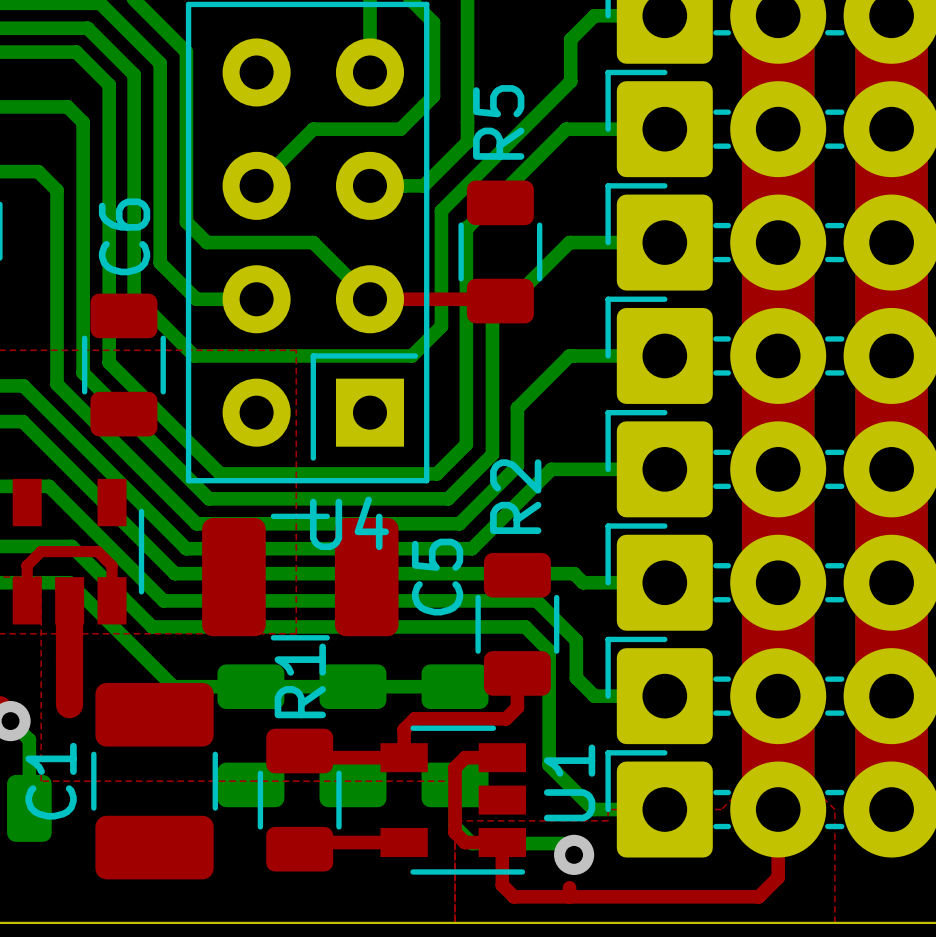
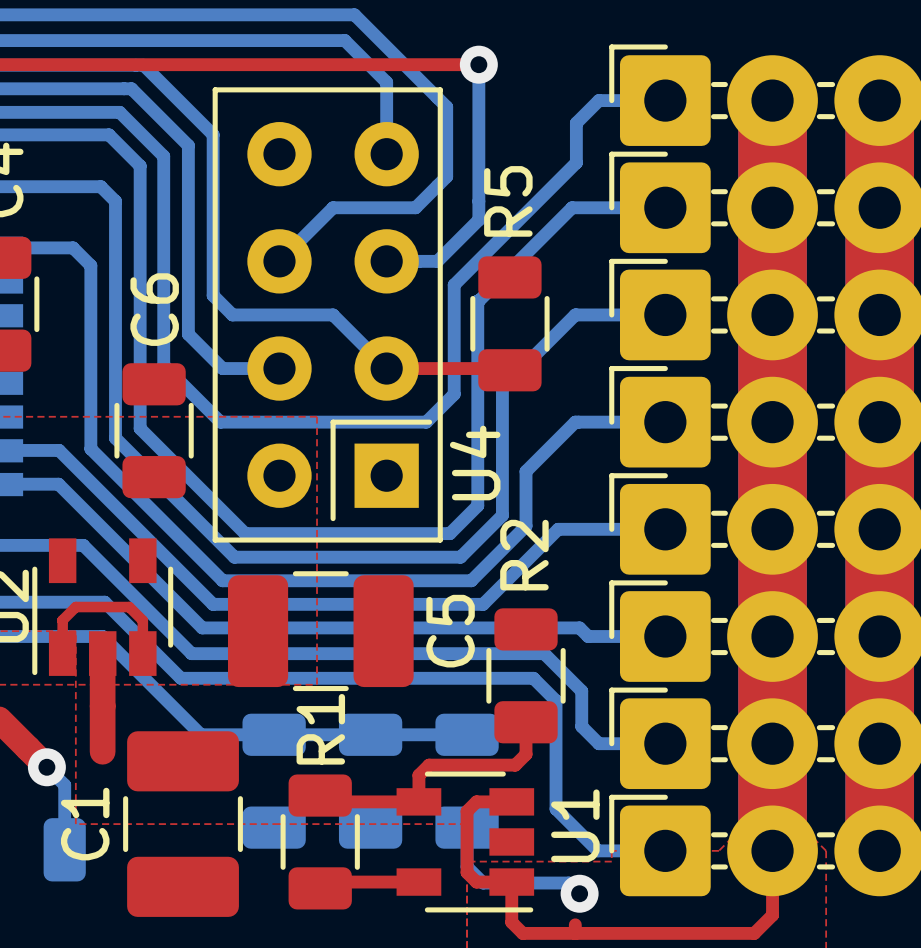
U4 name rotation: 0° (349, 523) -> 90° counterclockwise (475, 463)
U4 name position: U4 (349, 523) -> U4 (475, 463)

